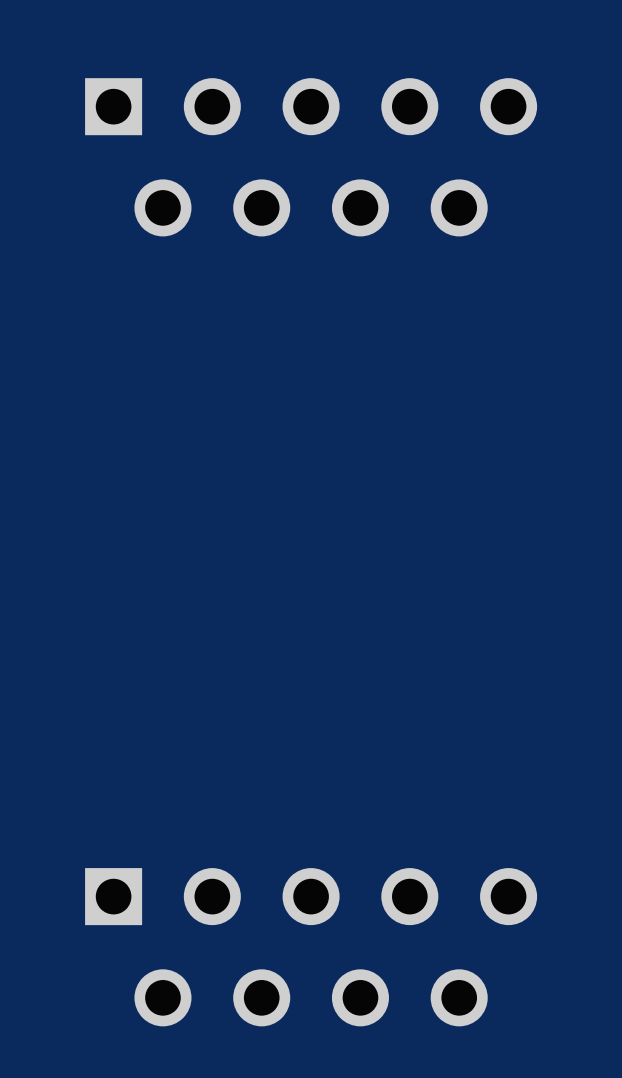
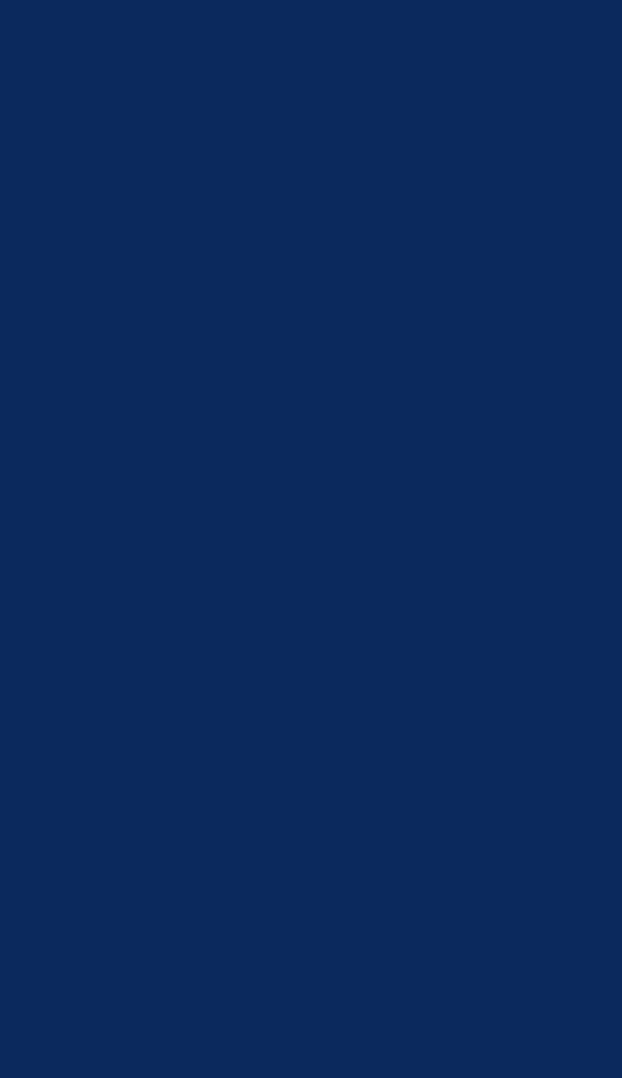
part: (311, 157) -> none
part: (311, 947) -> none

